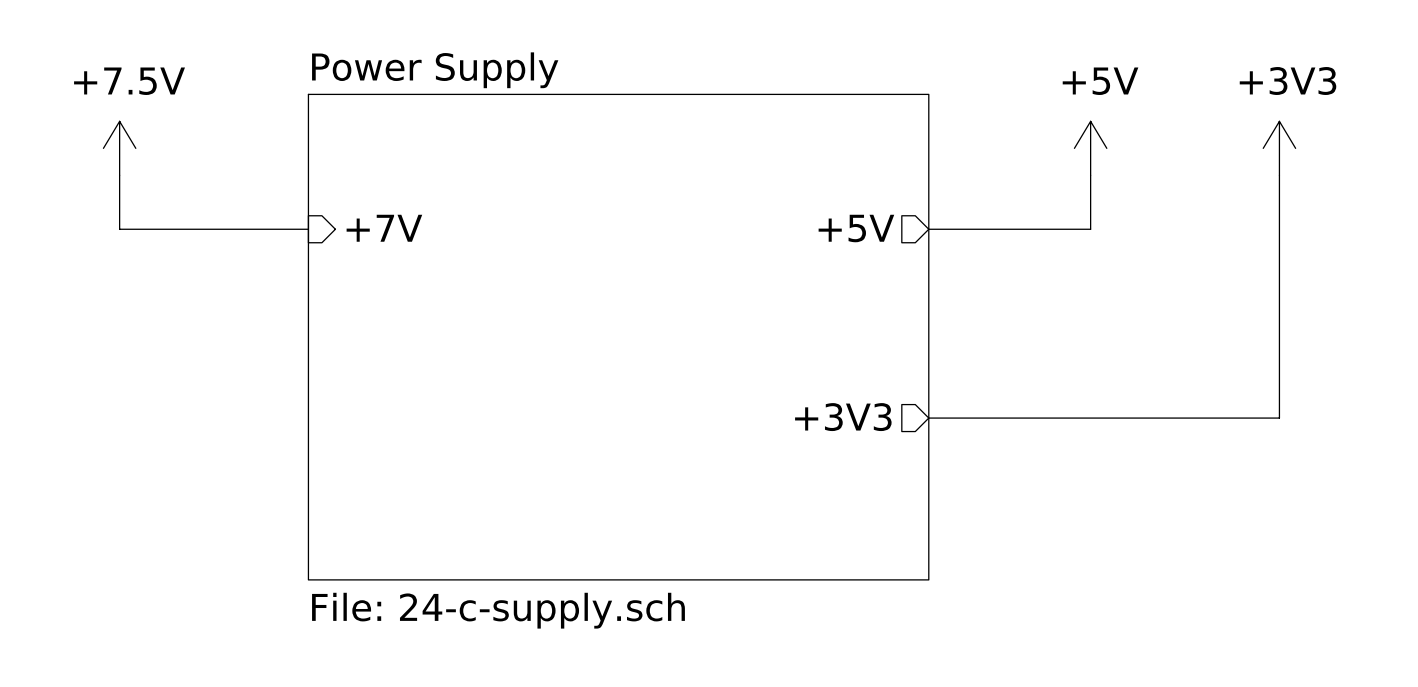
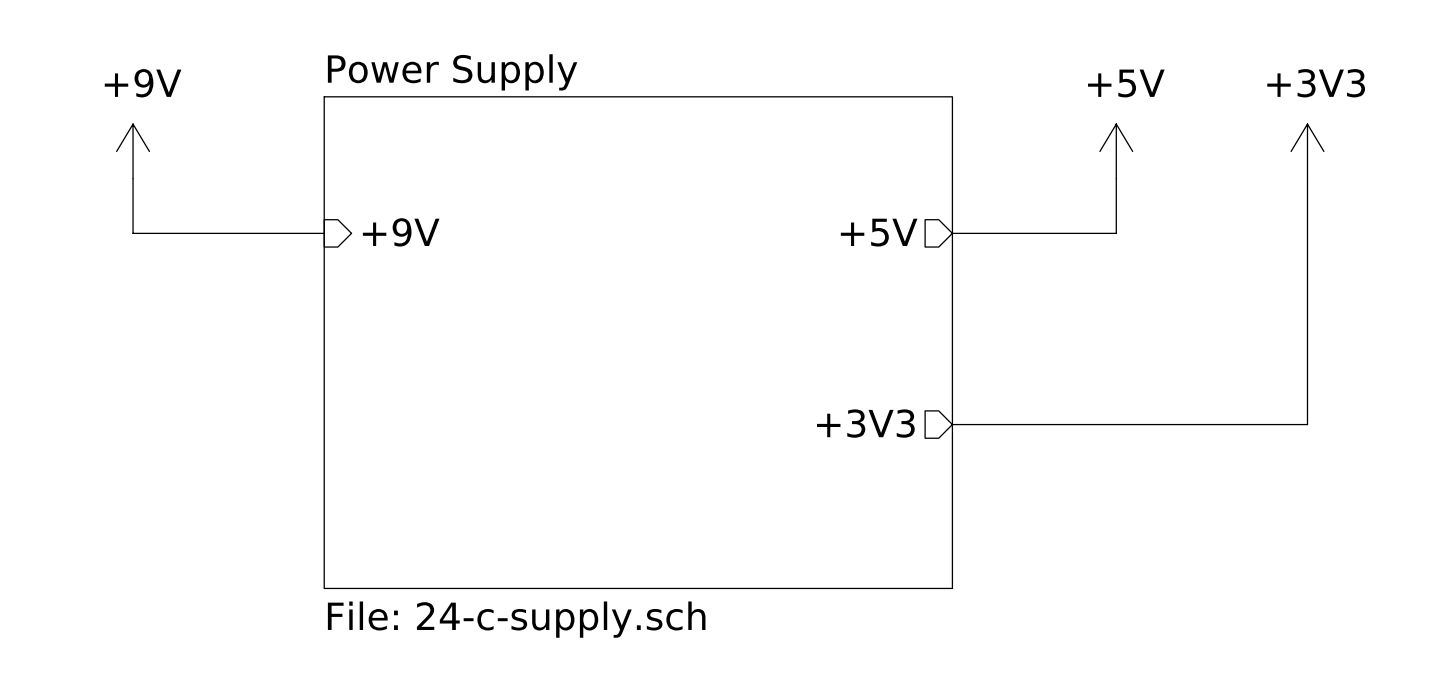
power symbol: +7.5V (119, 148) -> +9V (133, 151)
sheet pin: +7V (384, 228) -> +9V (401, 232)

